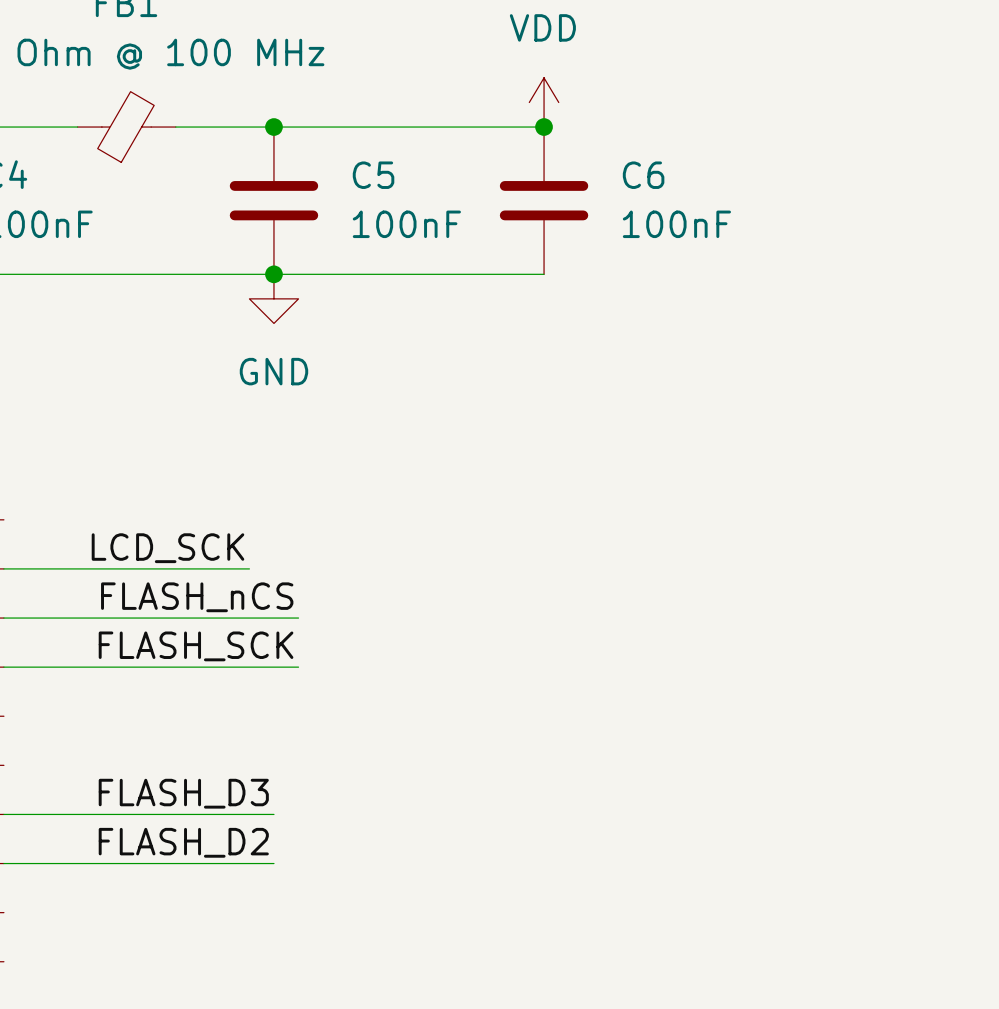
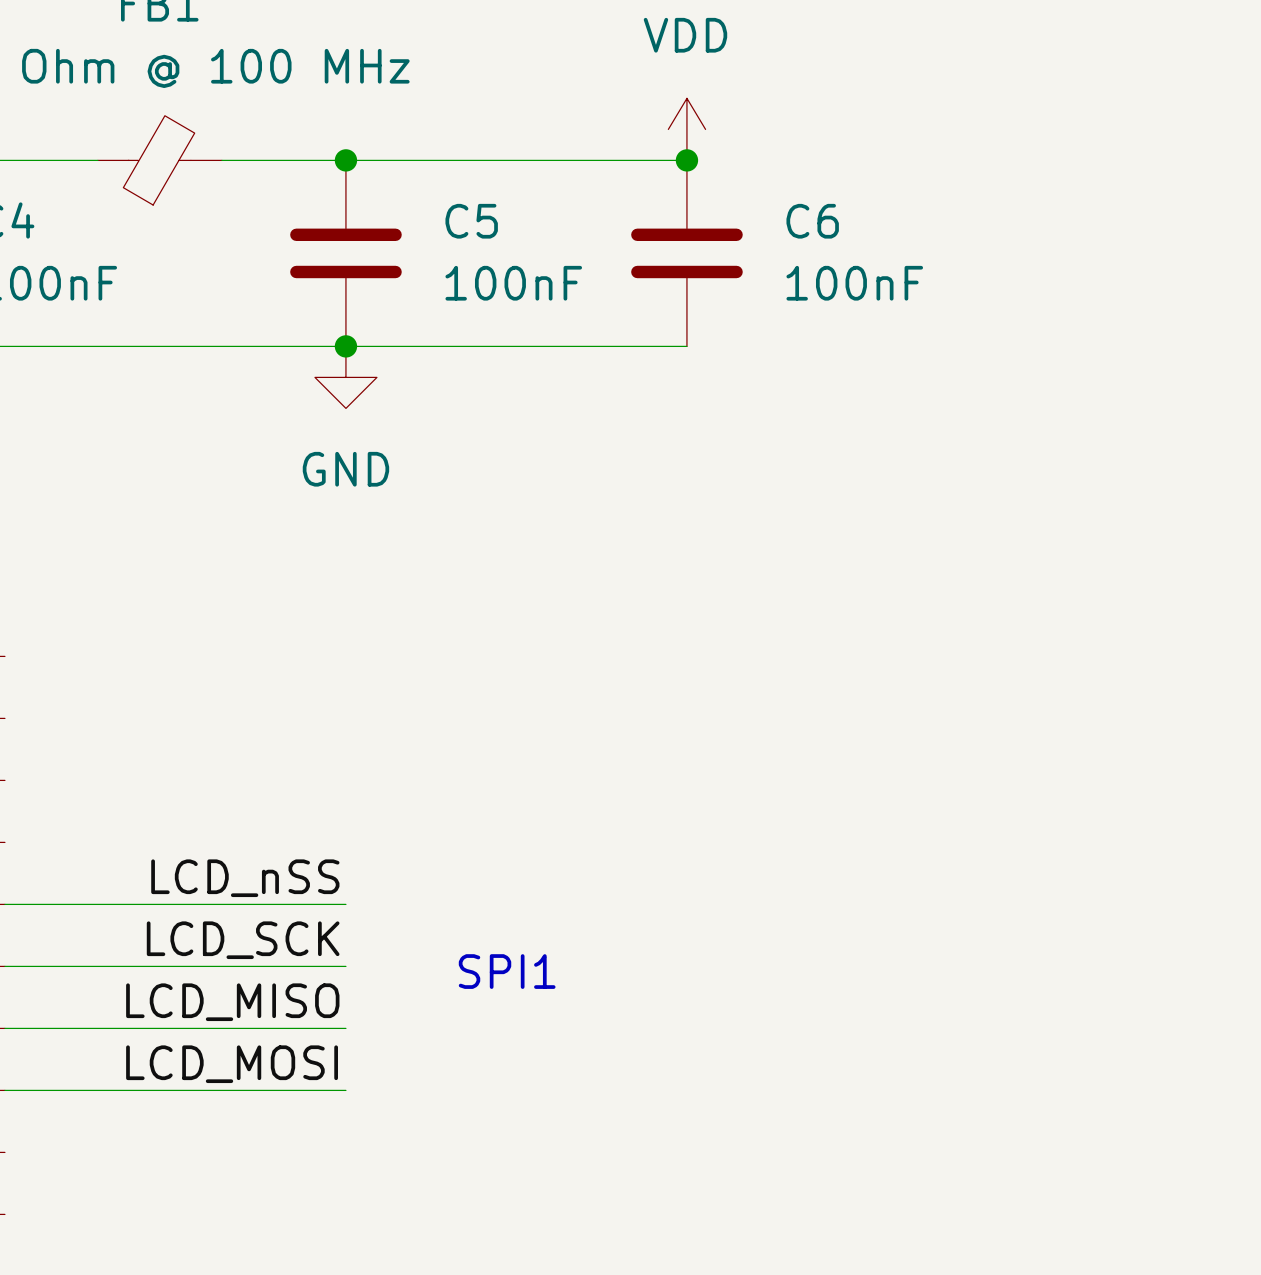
label position: LCD_SCK (167, 548) -> LCD_SCK (243, 940)
wire: (3, 568) (249, 568) -> none
label: FLASH_nCS (197, 597) -> none
wire: (3, 618) (298, 618) -> none
label: FLASH_SCK (196, 646) -> none
wire: (3, 667) (298, 667) -> none
label: none -> LCD_nSS (245, 878)
wire: none -> (4, 904) (345, 904)
wire: none -> (4, 966) (345, 966)
text: none -> SPI1 (507, 971)
label: FLASH_D3 (183, 793) -> LCD_MISO (232, 1002)
label: FLASH_D2 (183, 842) -> LCD_MOSI (232, 1064)

